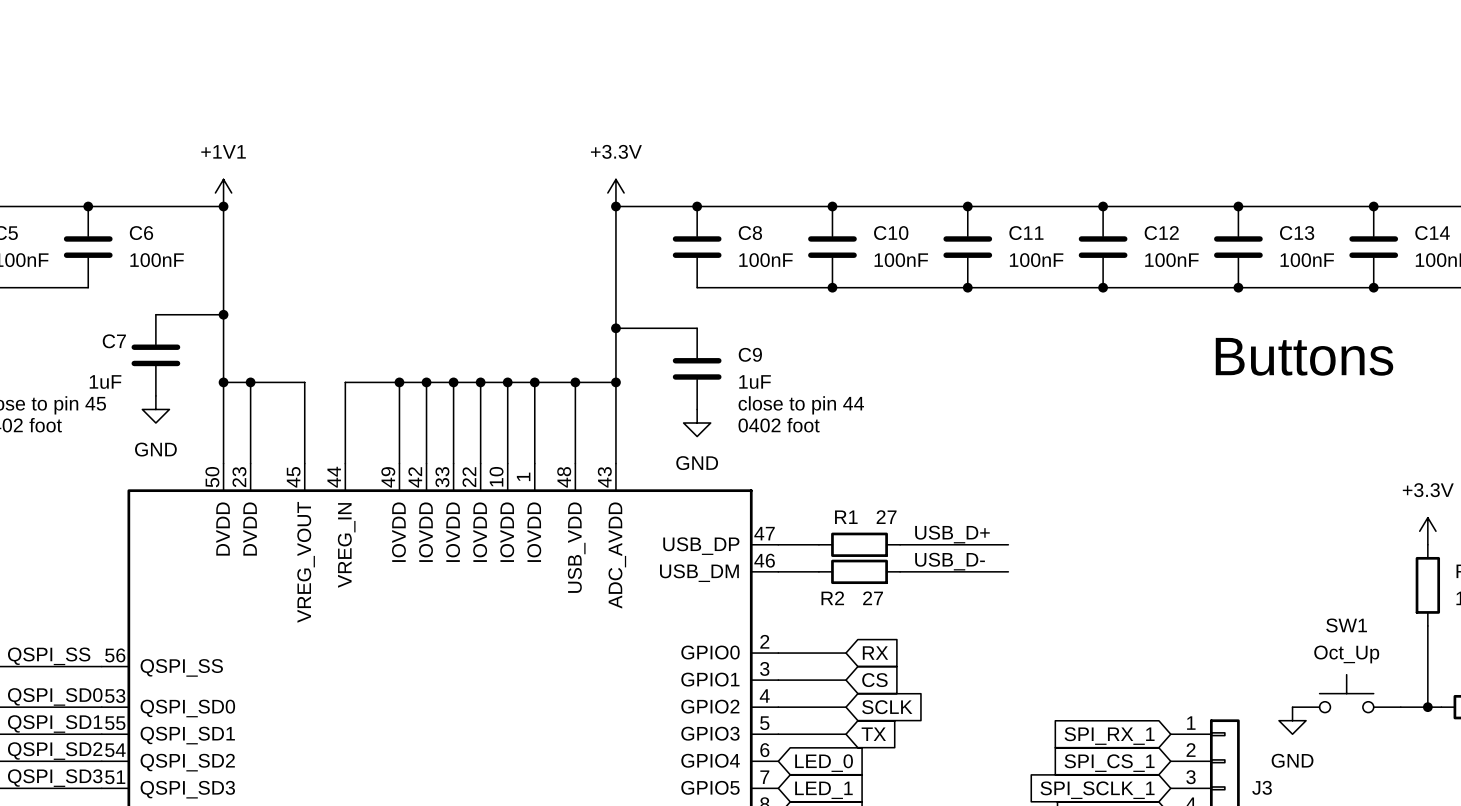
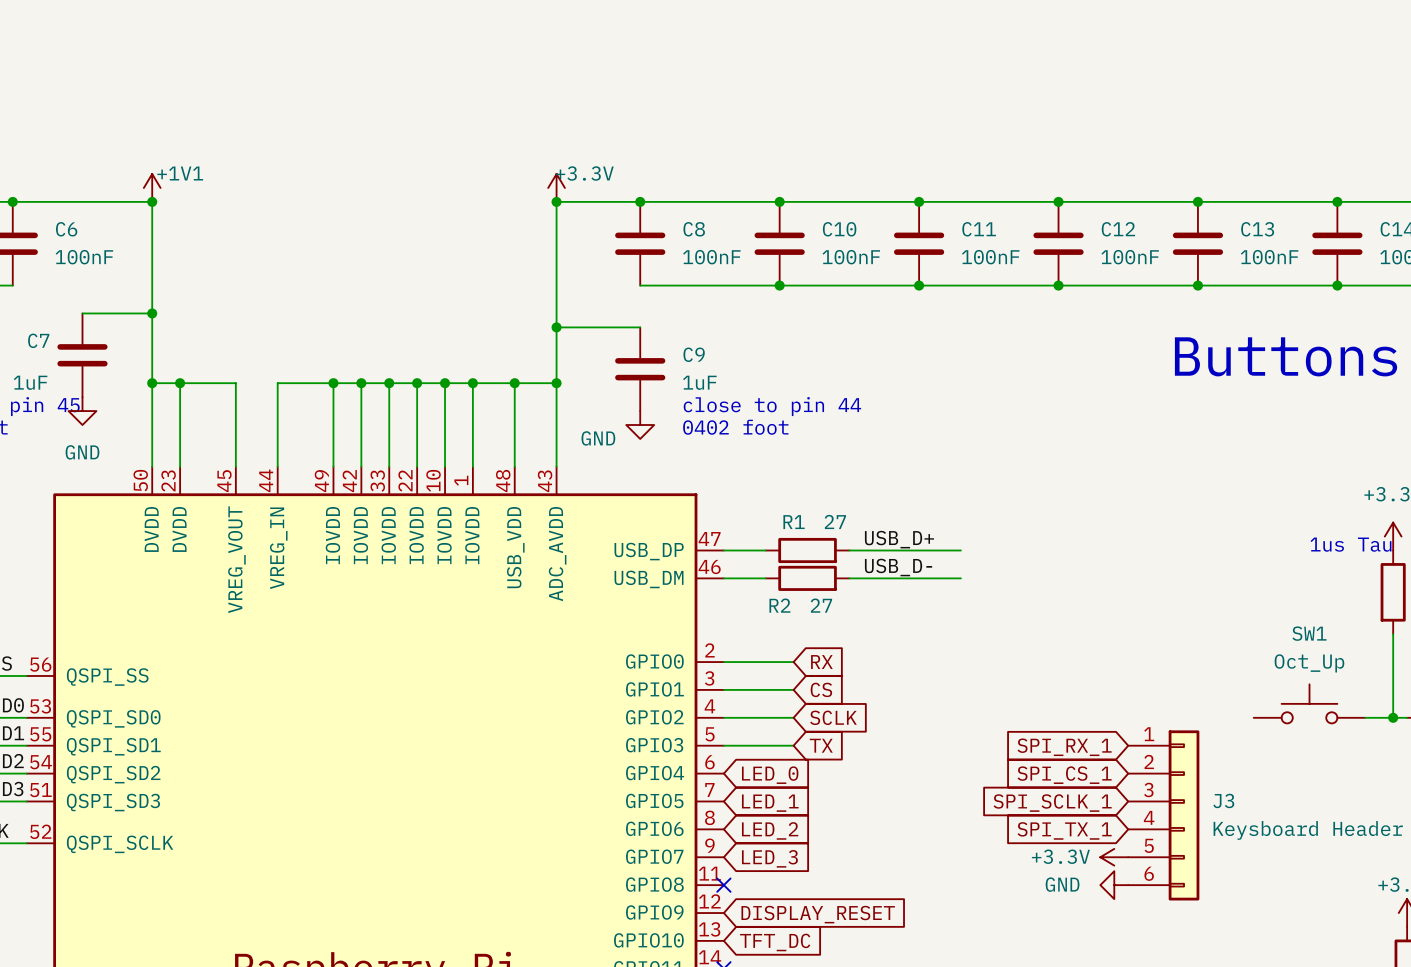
power symbol text position: +1V1 (223, 151) -> +1V1 (180, 173)
power symbol text position: +3.3V (616, 151) -> +3.3V (584, 173)
power symbol text position: GND (697, 463) -> GND (598, 438)
text: none -> 1us Tau (1351, 544)
power symbol: GND (1292, 720) -> none

